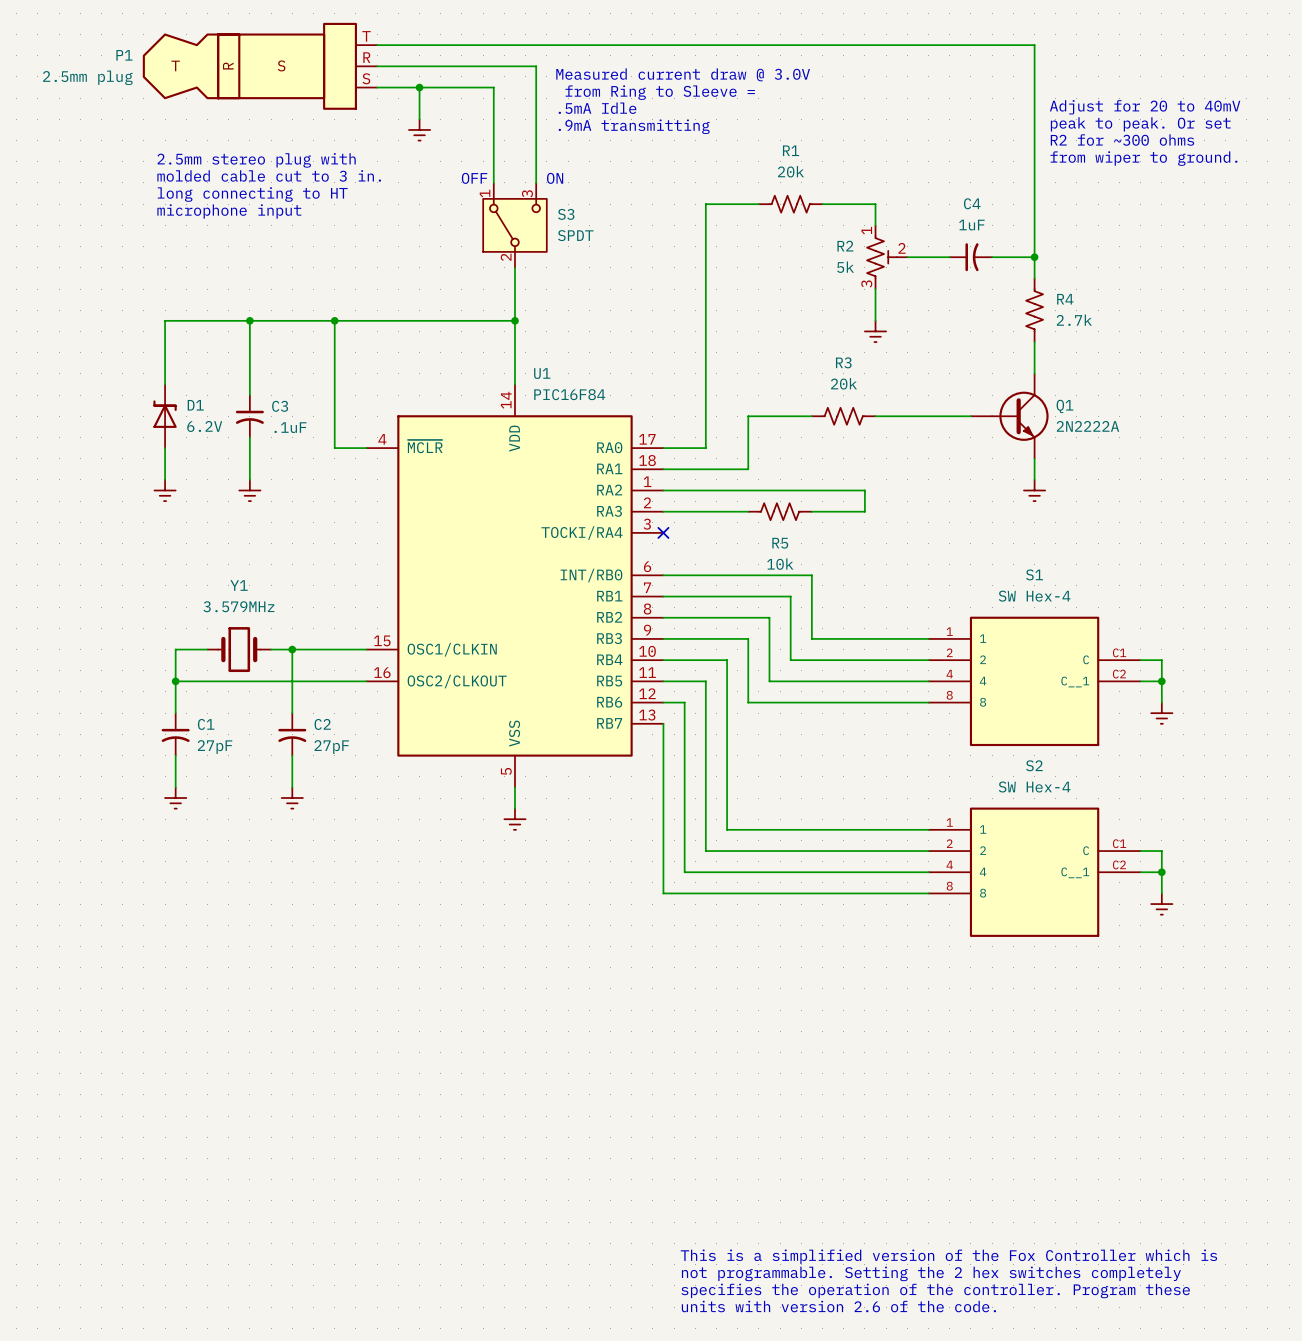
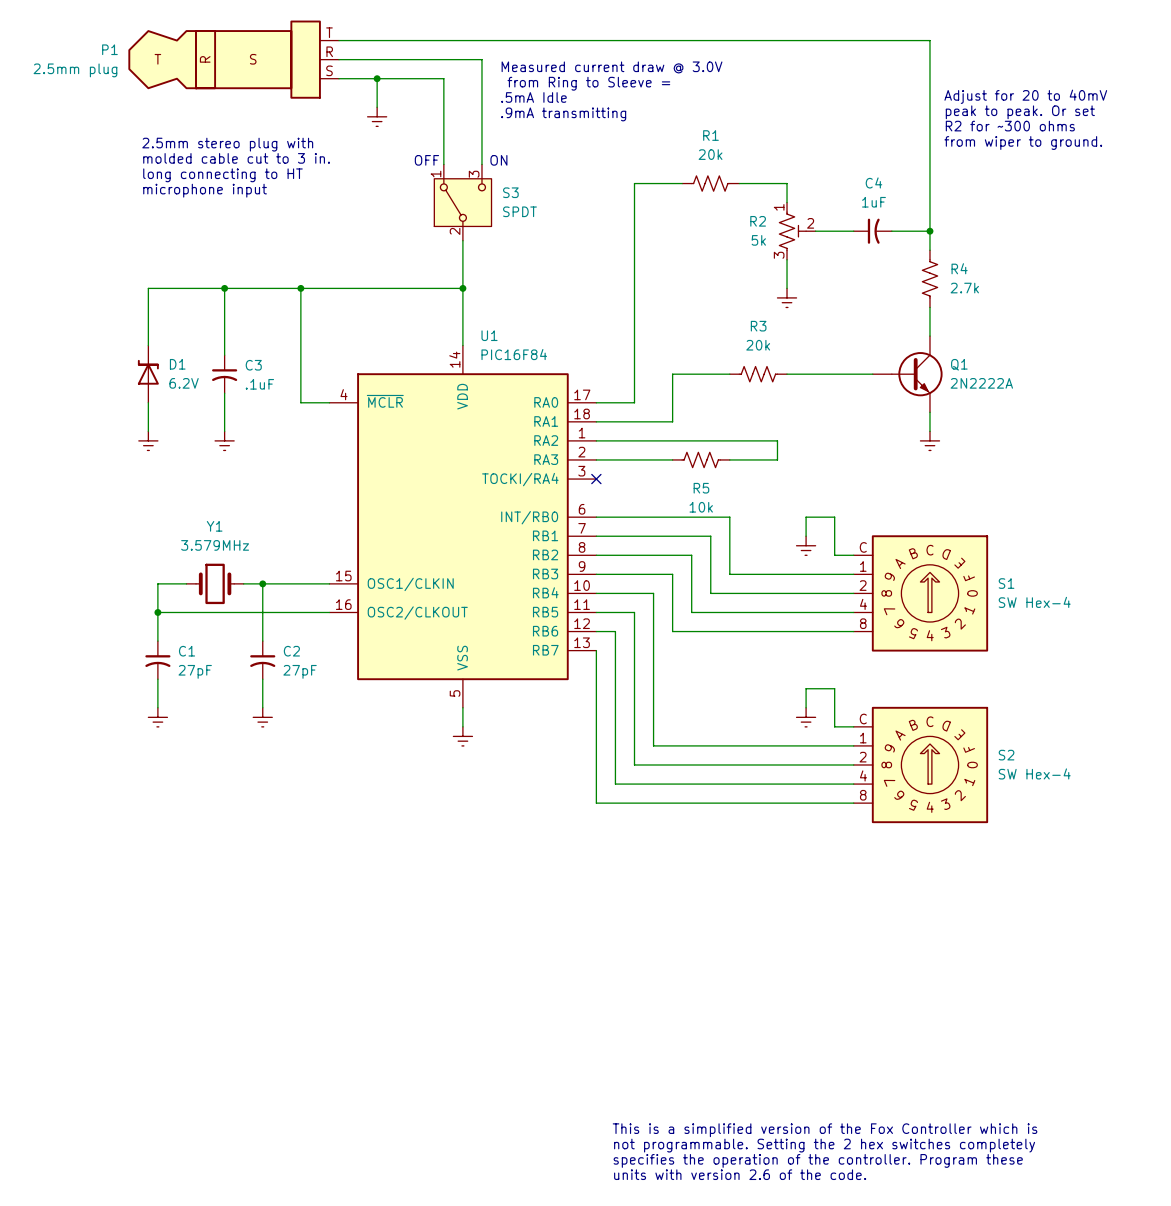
S1 name position: S1 (1034, 574) -> S1 (1006, 583)
wire: none -> (806, 536) (806, 517) (834, 517) (834, 555) (853, 555)
S1 value position: SW Hex-4 (1034, 596) -> SW Hex-4 (1034, 602)
power symbol: none -> (806, 545)
S1 symbol: [928, 616, 1141, 747] -> [853, 535, 989, 652]
wire: (1140, 660) (1161, 660) (1161, 702) -> none
wire: (1140, 681) (1161, 681) -> none
junction: (1161, 681) -> none
power symbol: (1161, 713) -> none
S2 name position: S2 (1034, 765) -> S2 (1006, 755)
wire: none -> (806, 707) (806, 688) (834, 688) (834, 726) (853, 726)
S2 value position: SW Hex-4 (1034, 787) -> SW Hex-4 (1034, 773)
power symbol: none -> (806, 717)
S2 symbol: [928, 807, 1141, 937] -> [853, 706, 989, 824]
wire: (1140, 851) (1161, 851) (1161, 893) -> none
wire: (1140, 872) (1161, 872) -> none
junction: (1161, 872) -> none
power symbol: (1161, 904) -> none

